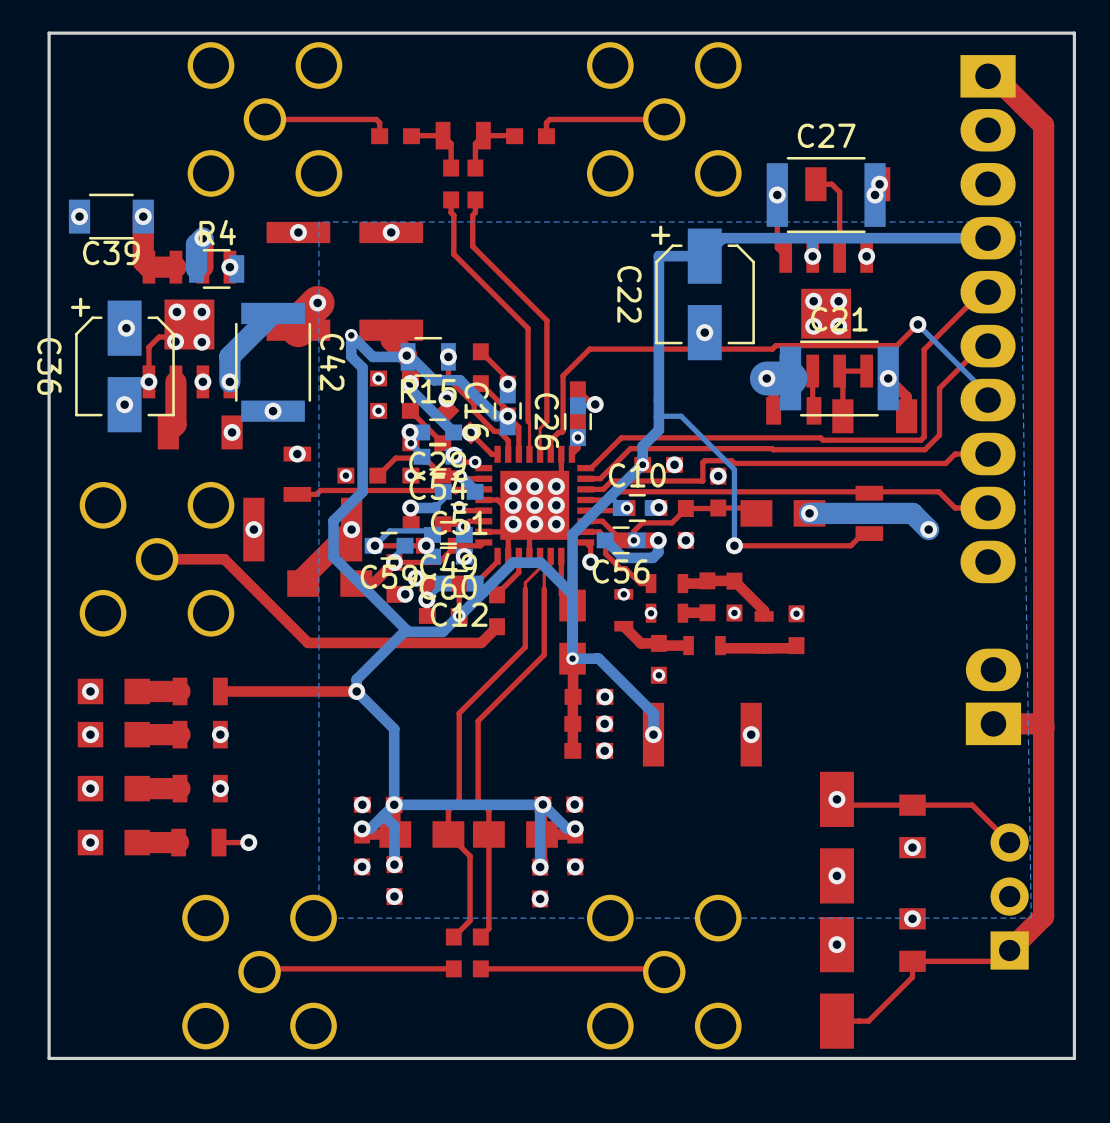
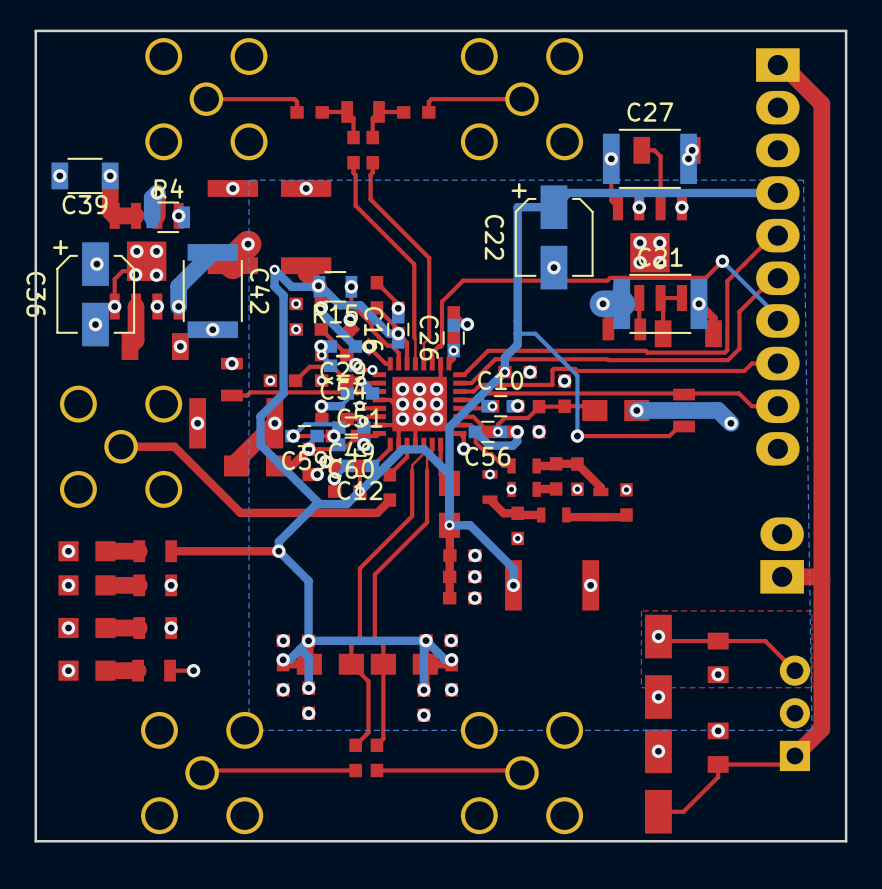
top zone outline: none -> (811, 610) (811, 687) (641, 687) (641, 610) (811, 610)

